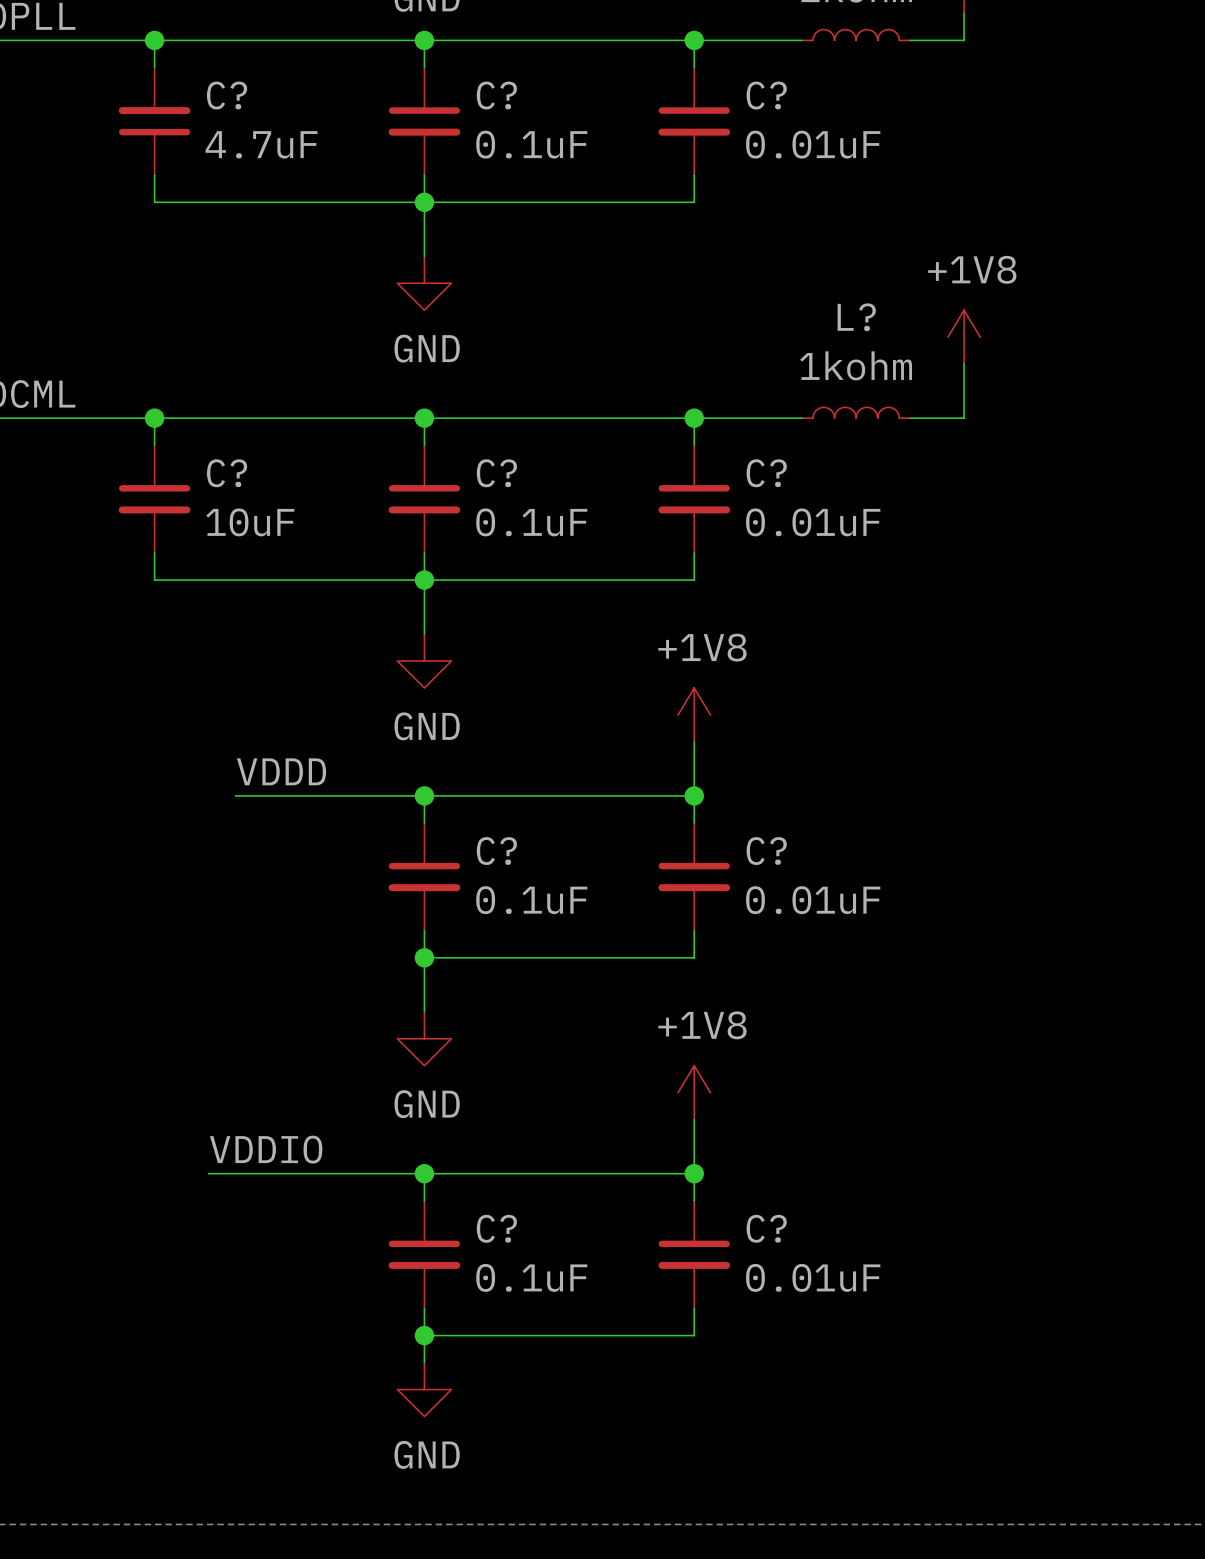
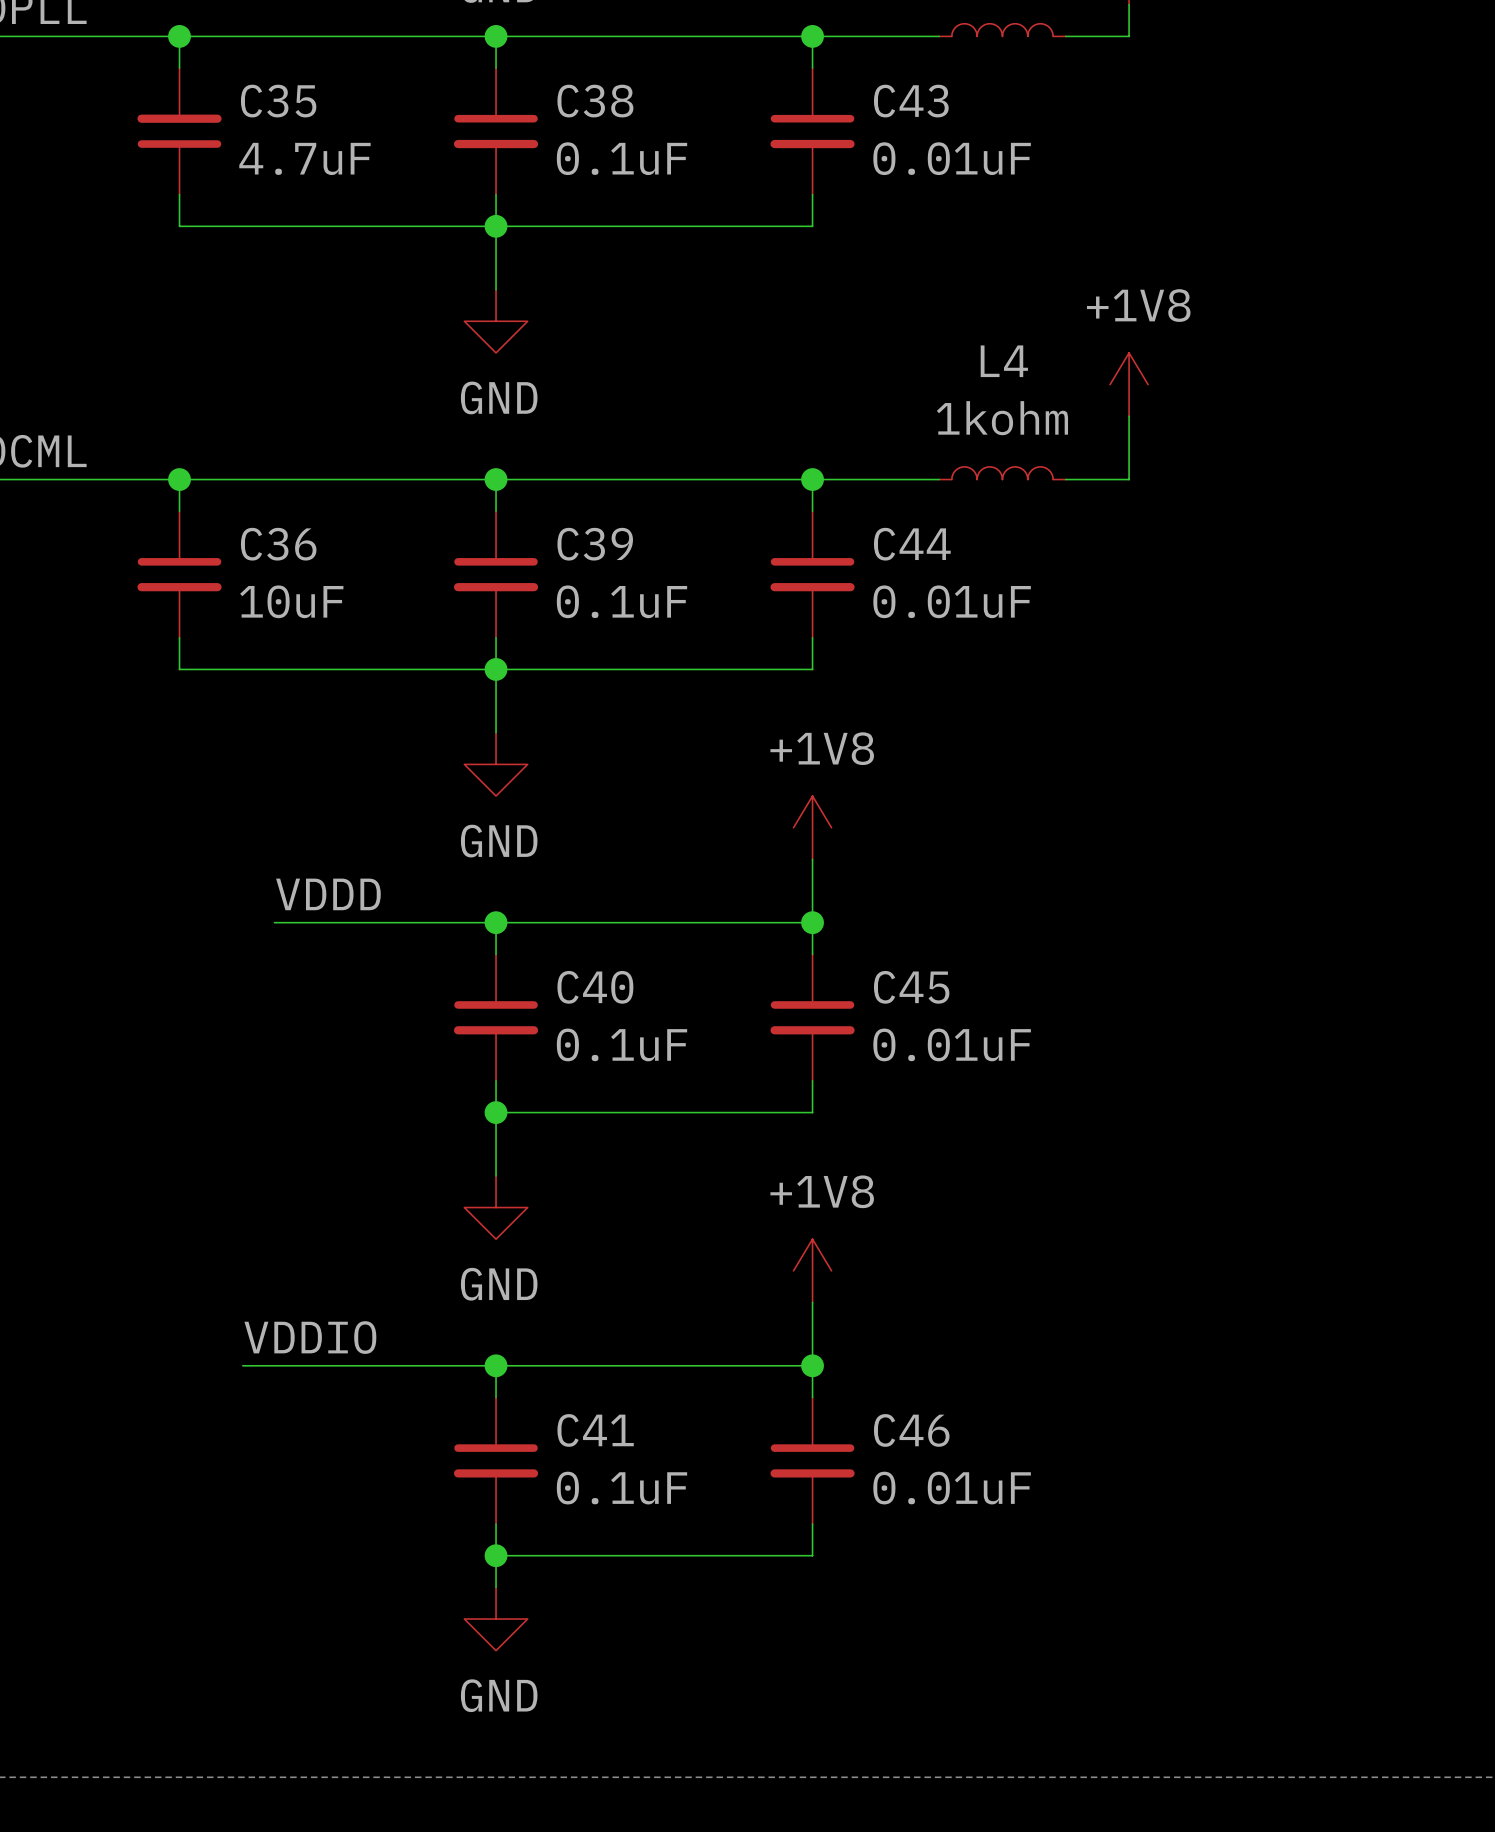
C? name: C? (227, 95) -> C35 (278, 101)
C? name: C? (496, 95) -> C38 (595, 101)
C? name: C? (766, 95) -> C43 (911, 101)
L? name: L? (856, 317) -> L4 (1004, 361)
C? name: C? (227, 473) -> C36 (278, 544)
C? name: C? (496, 473) -> C39 (595, 544)
C? name: C? (766, 473) -> C44 (912, 544)
C? name: C? (496, 851) -> C40 (595, 987)
C? name: C? (766, 851) -> C45 (911, 987)
C? name: C? (496, 1228) -> C41 (595, 1430)
C? name: C? (766, 1228) -> C46 (911, 1430)

